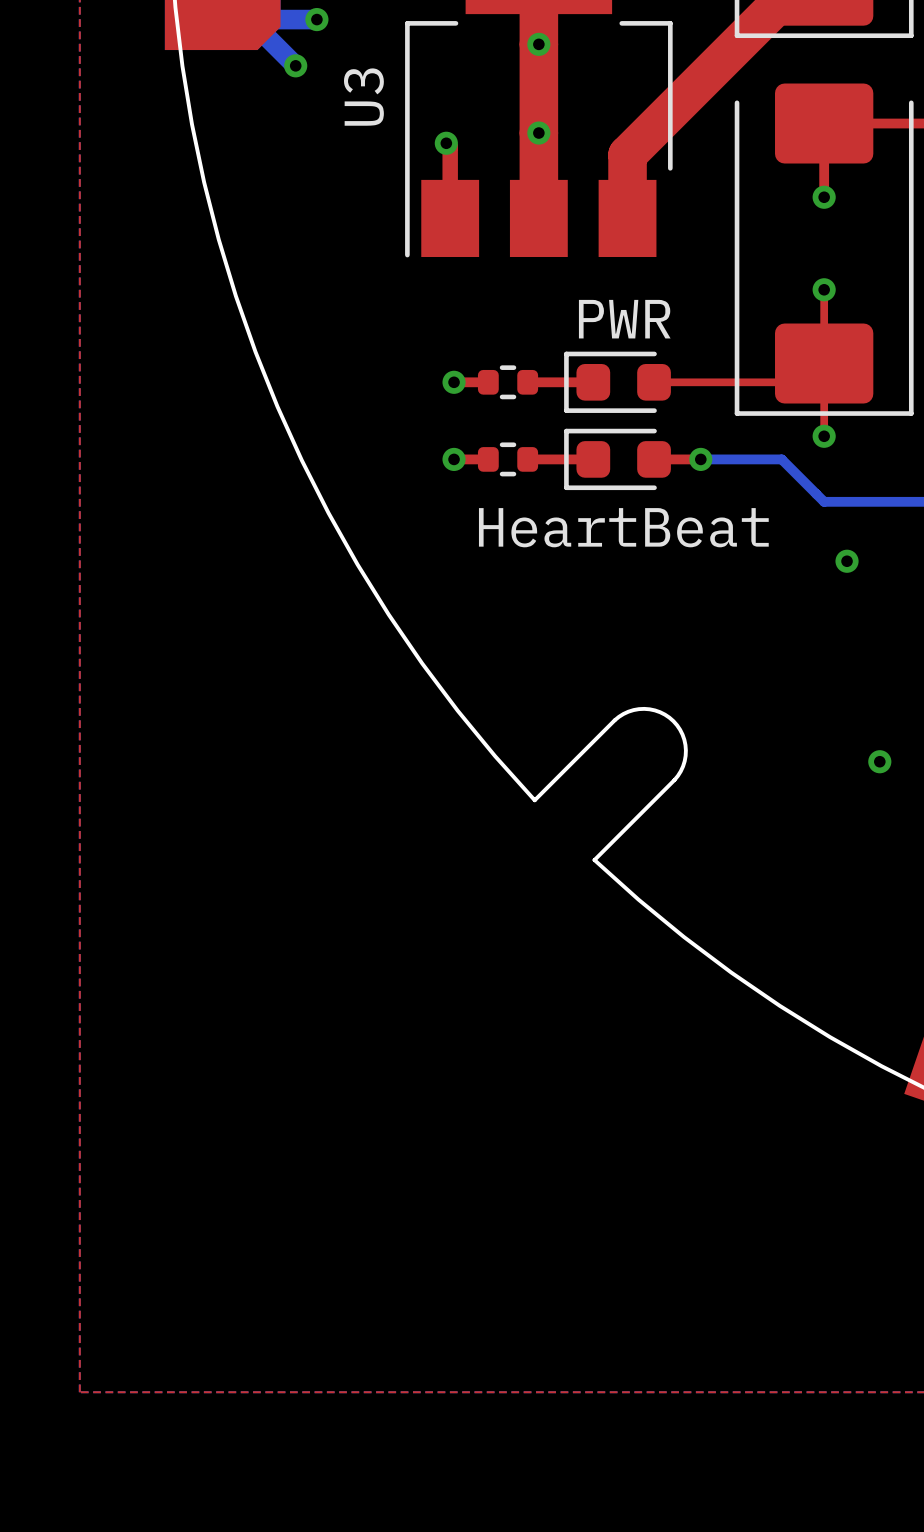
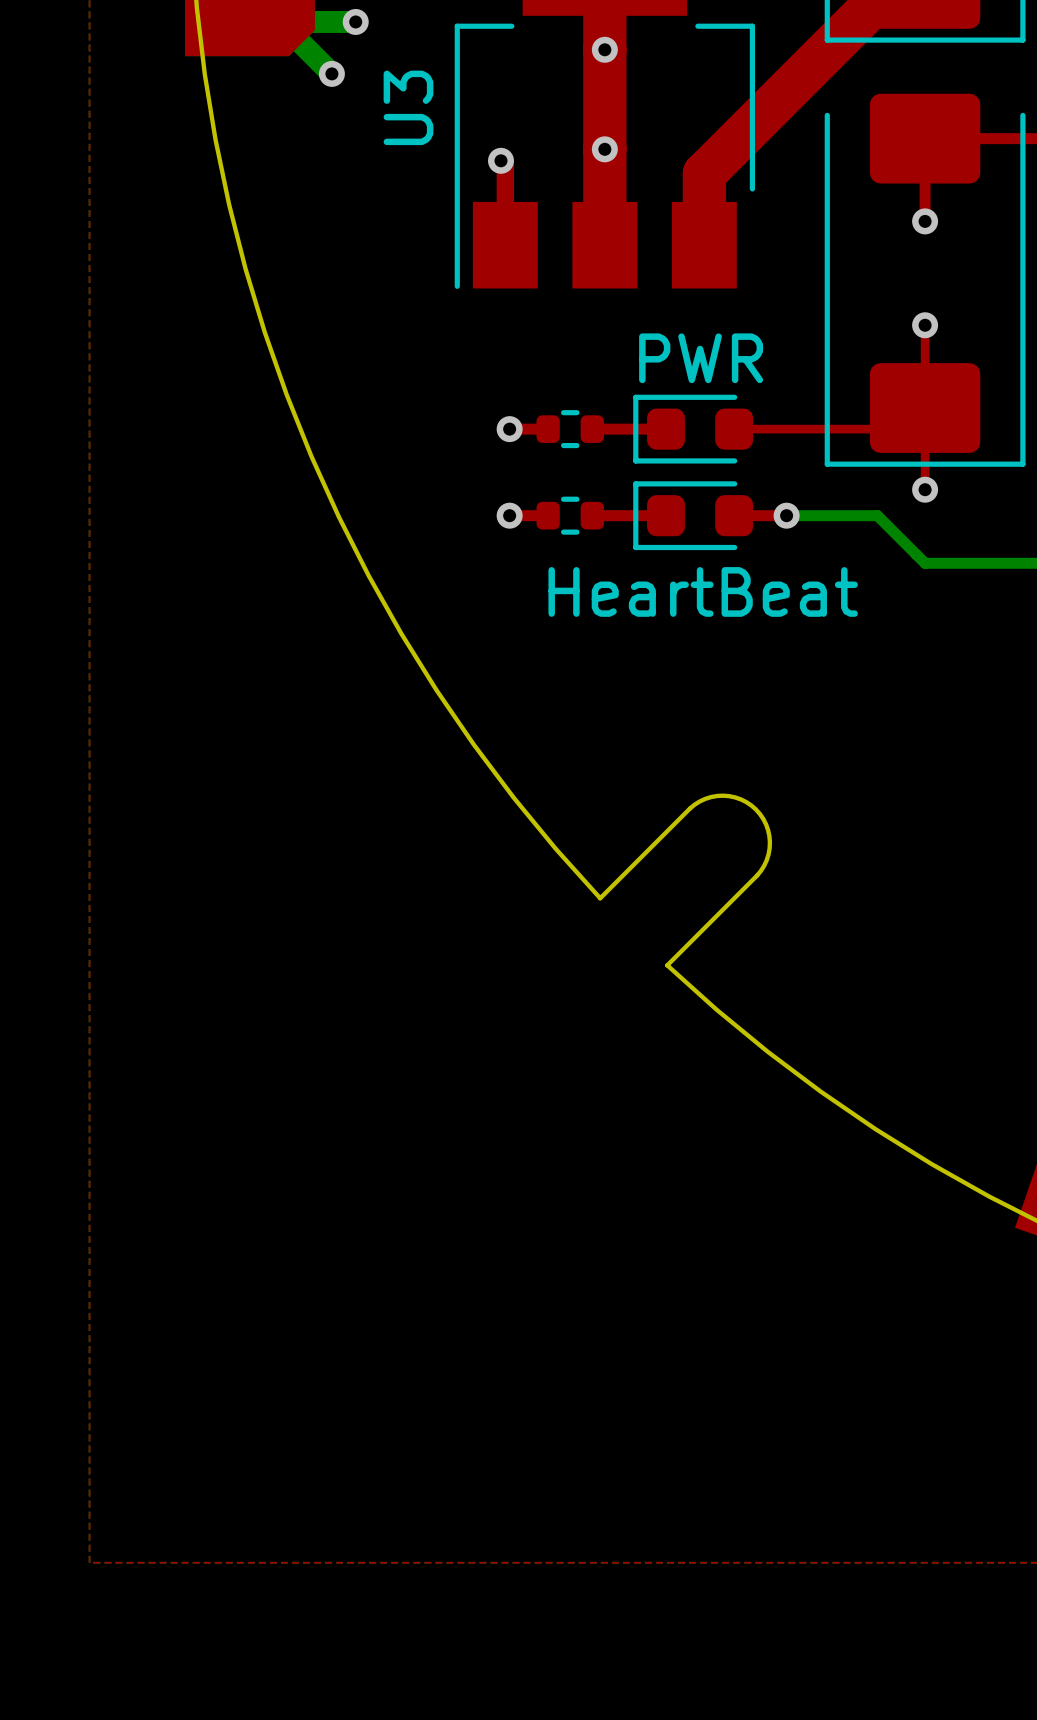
via: (847, 561) -> none
via: (879, 761) -> none

